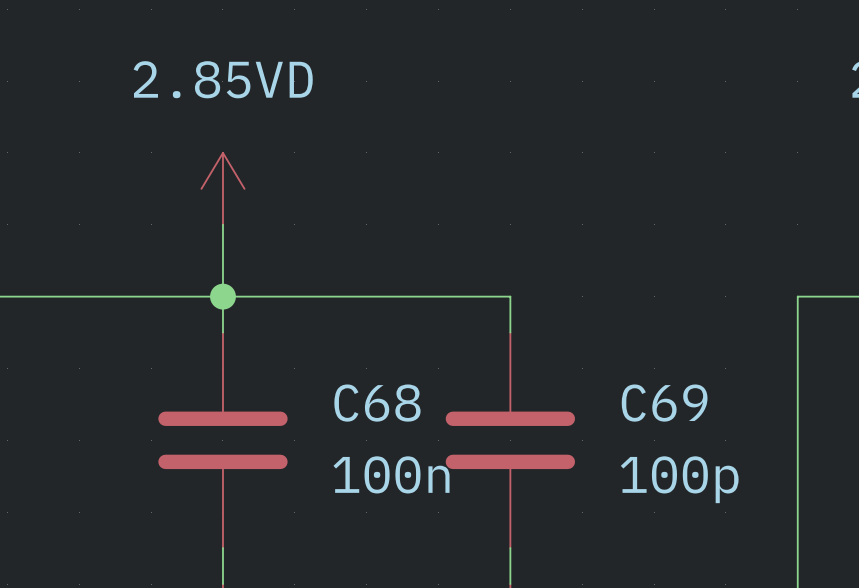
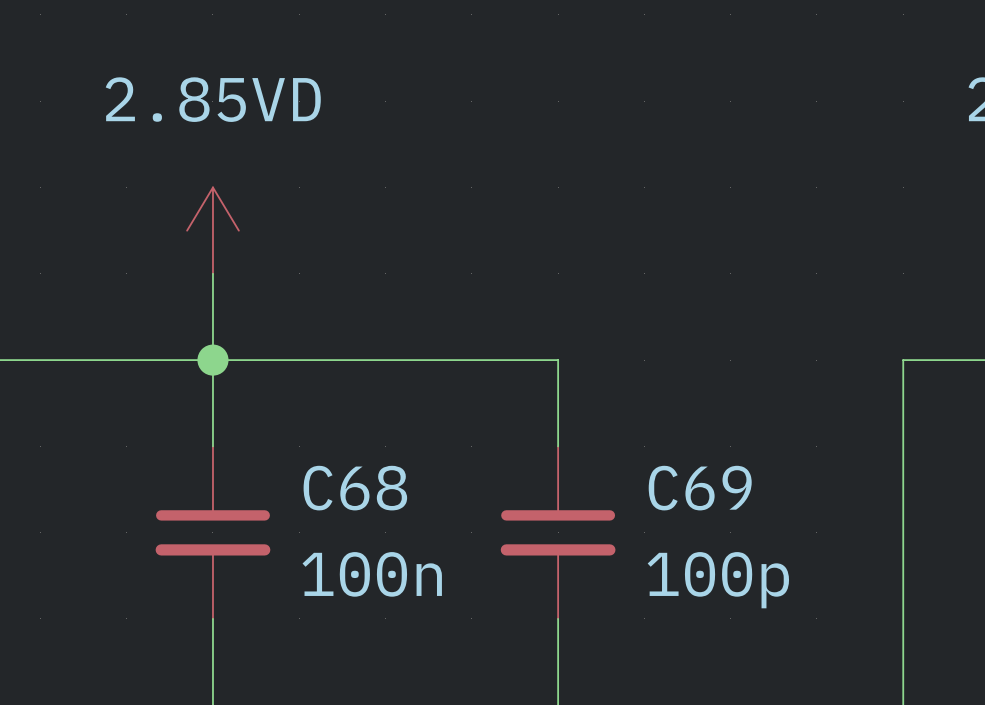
C68 symbol: [158, 332, 288, 549] -> [155, 446, 271, 619]
C69 symbol: [445, 332, 576, 549] -> [500, 446, 616, 619]

